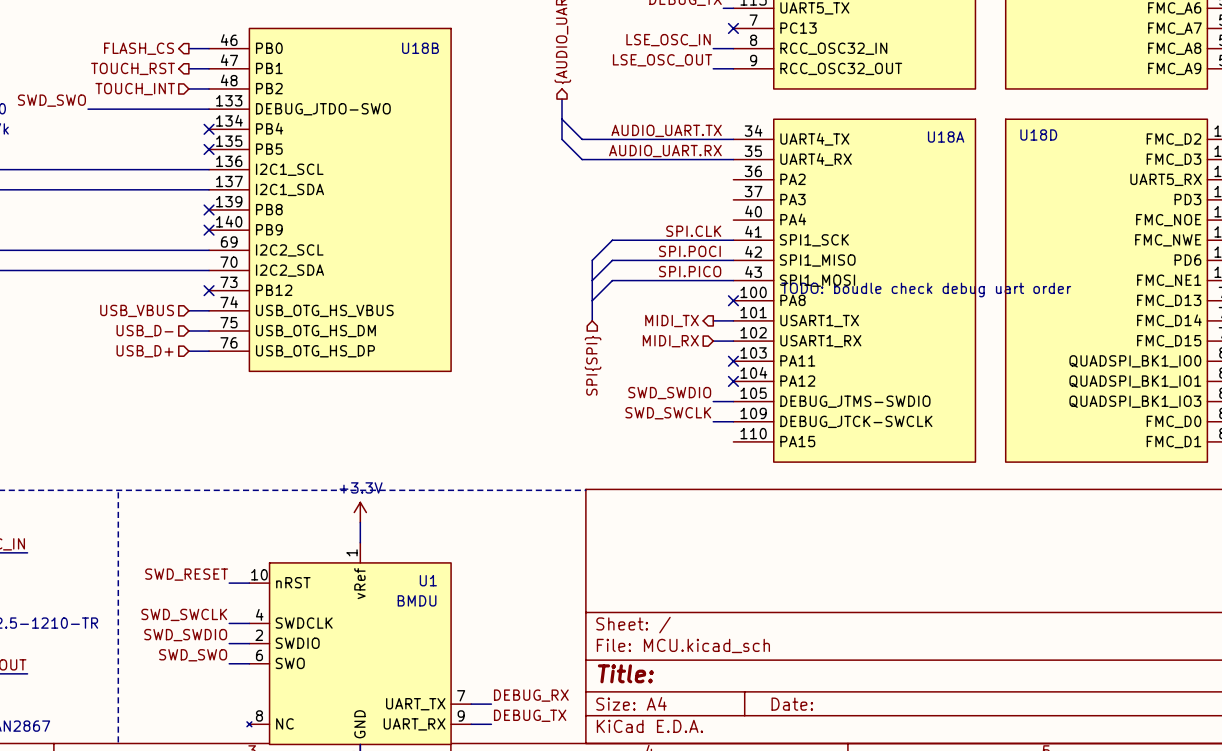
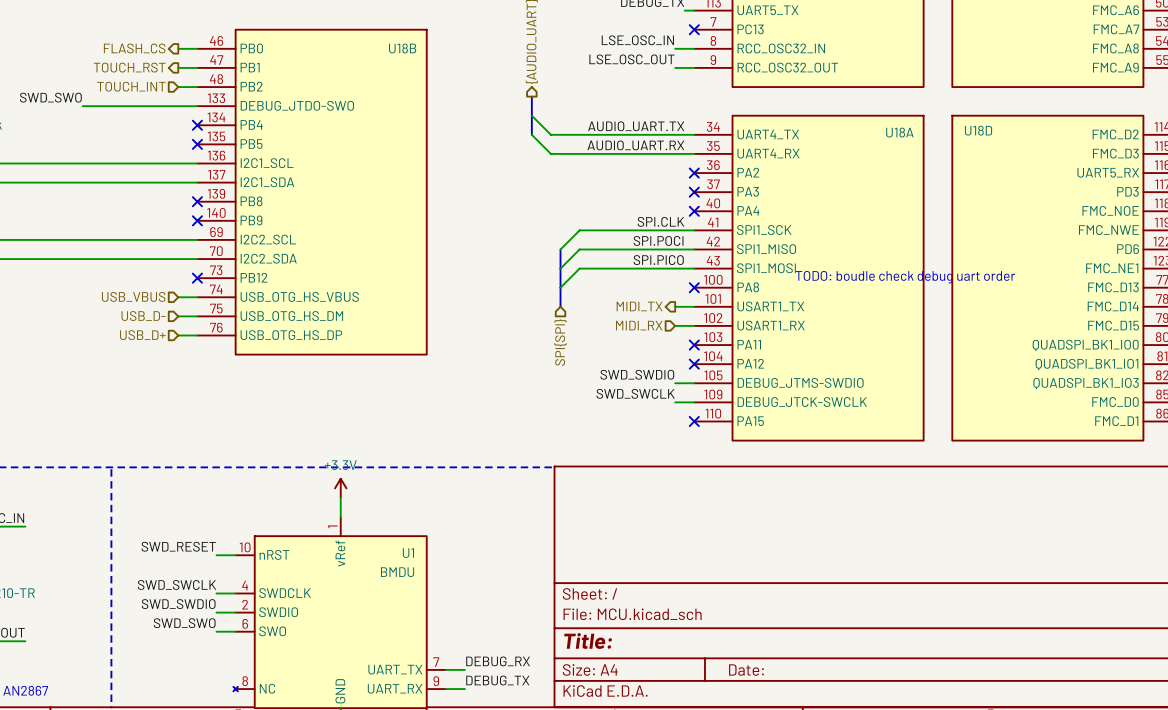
no-connect mark: none -> (694, 173)
no-connect mark: none -> (694, 192)
no-connect mark: none -> (694, 211)
no-connect mark: none -> (694, 421)

